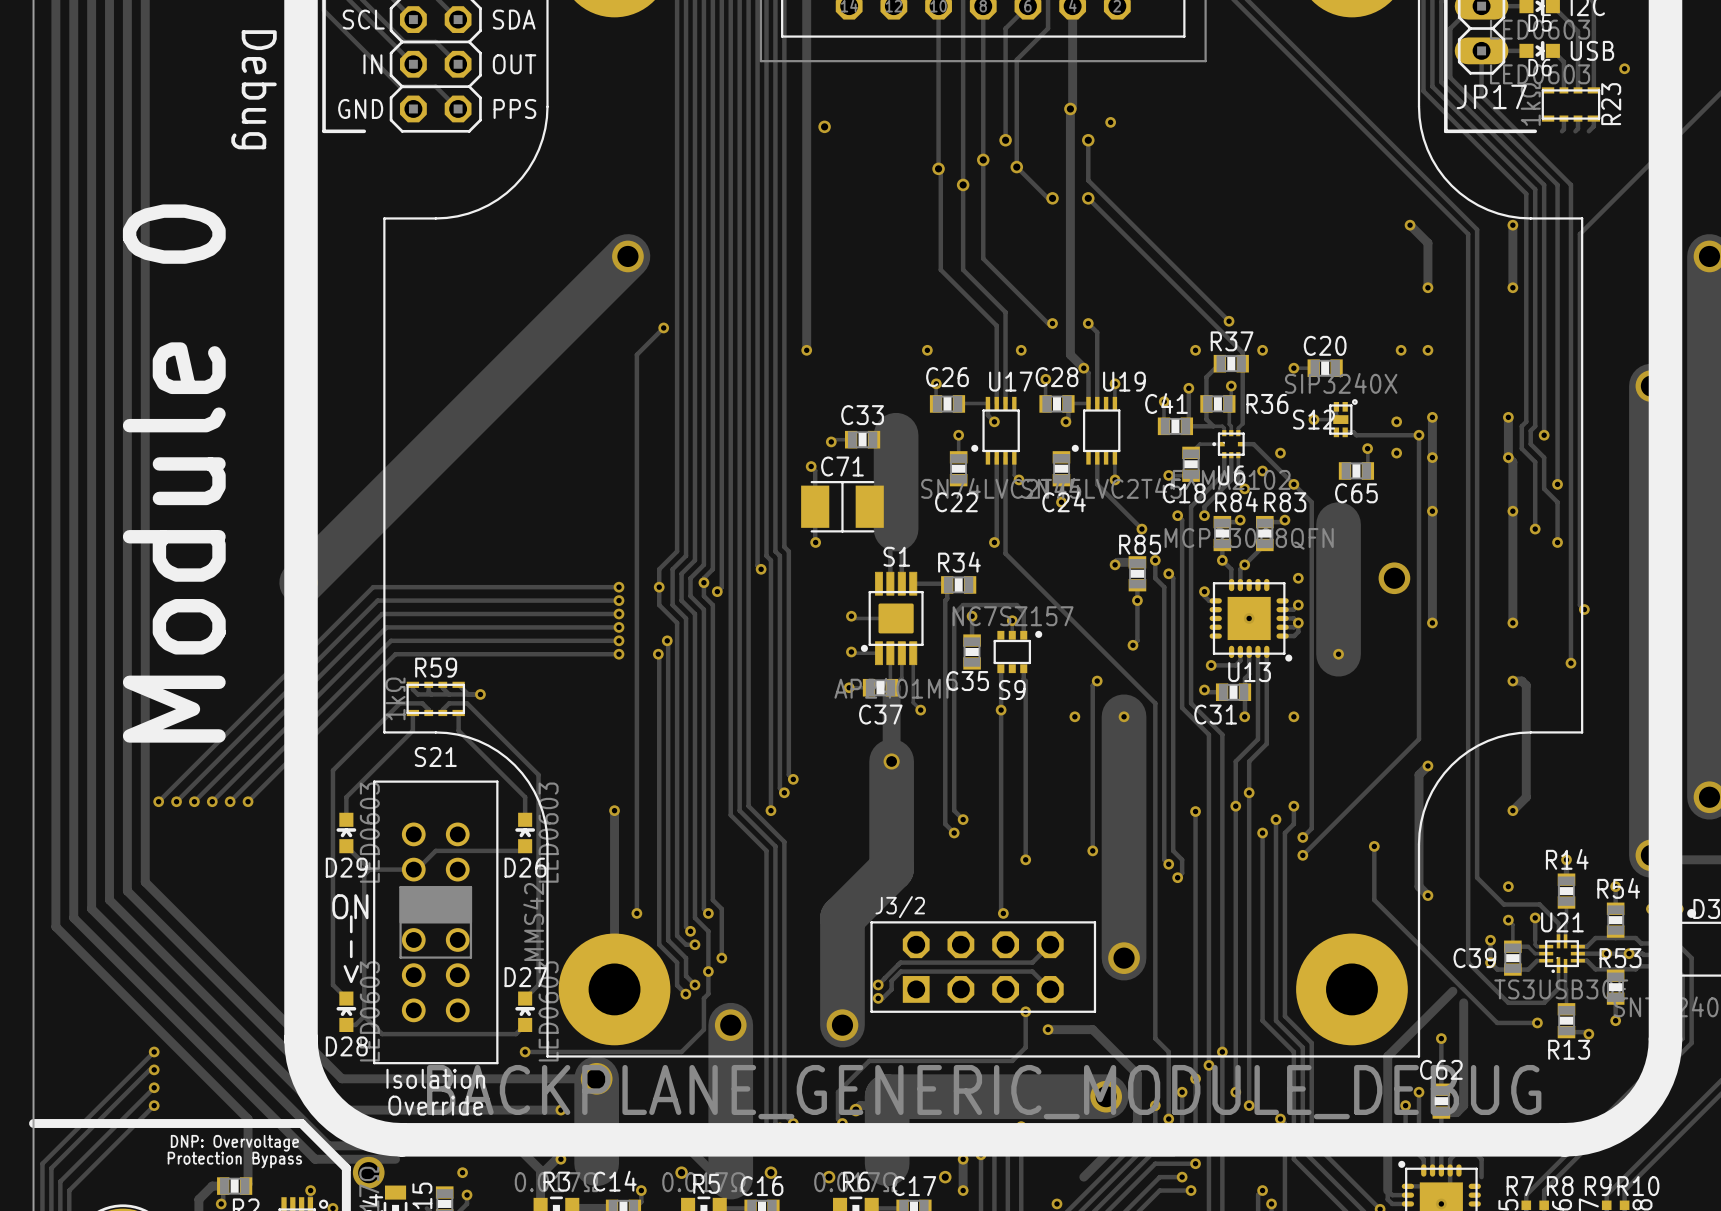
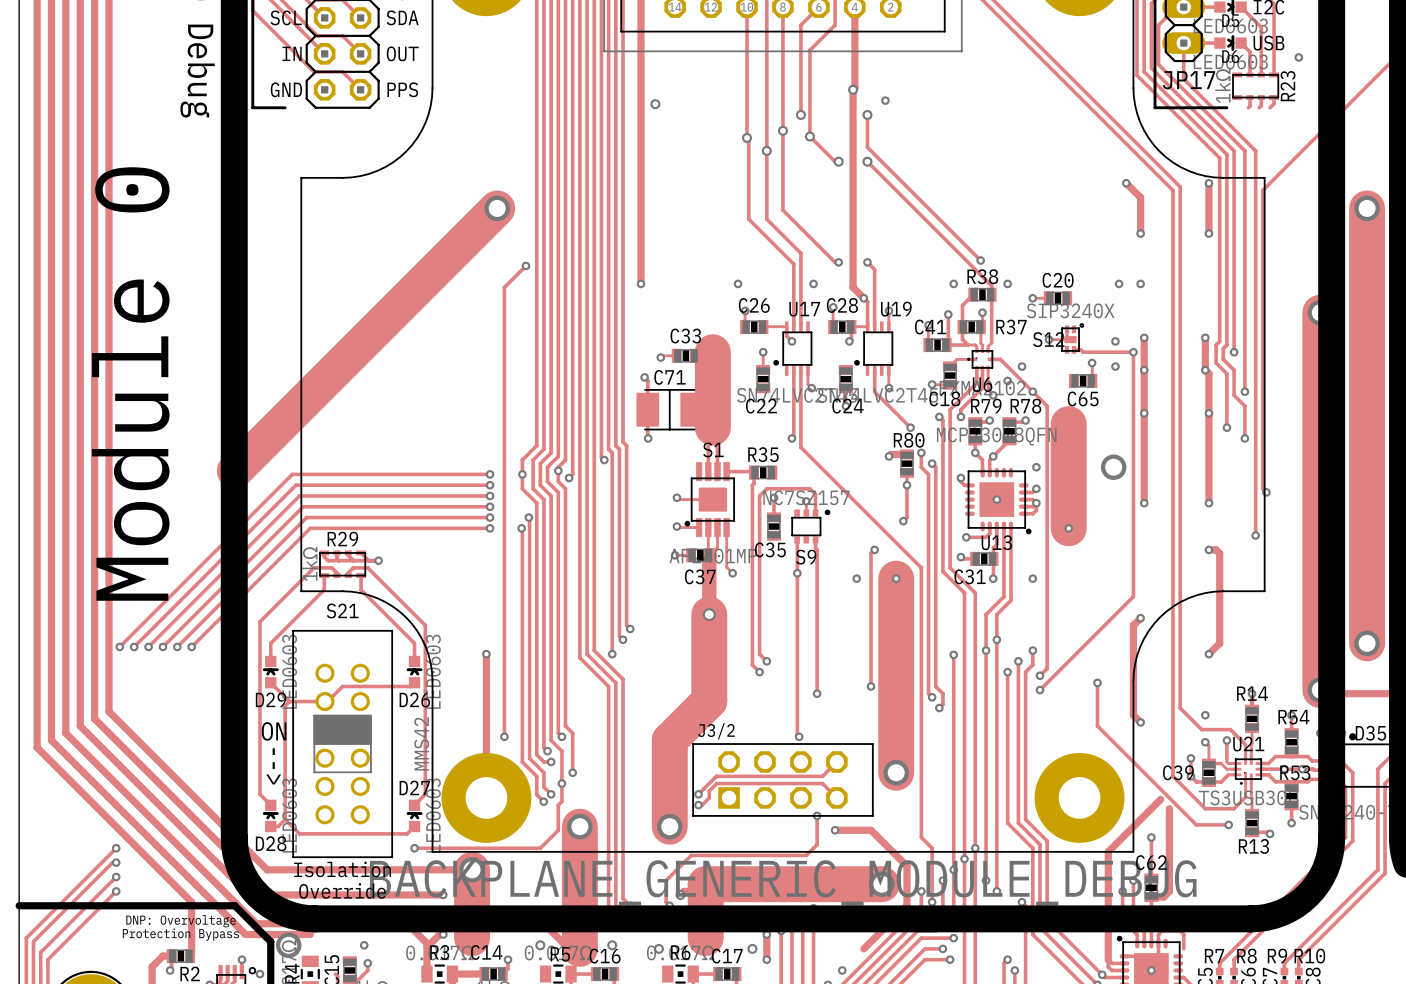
R37 name: R37 (1232, 341) -> R38 (982, 276)
R36 name: R36 (1267, 403) -> R37 (1011, 327)
R84 name: R84 (1236, 501) -> R79 (986, 406)
R83 name: R83 (1285, 502) -> R78 (1025, 406)
R85 name: R85 (1140, 544) -> R80 (909, 440)
R34 name: R34 (959, 562) -> R35 (763, 454)
R59 name: R59 (436, 667) -> R29 (342, 539)

